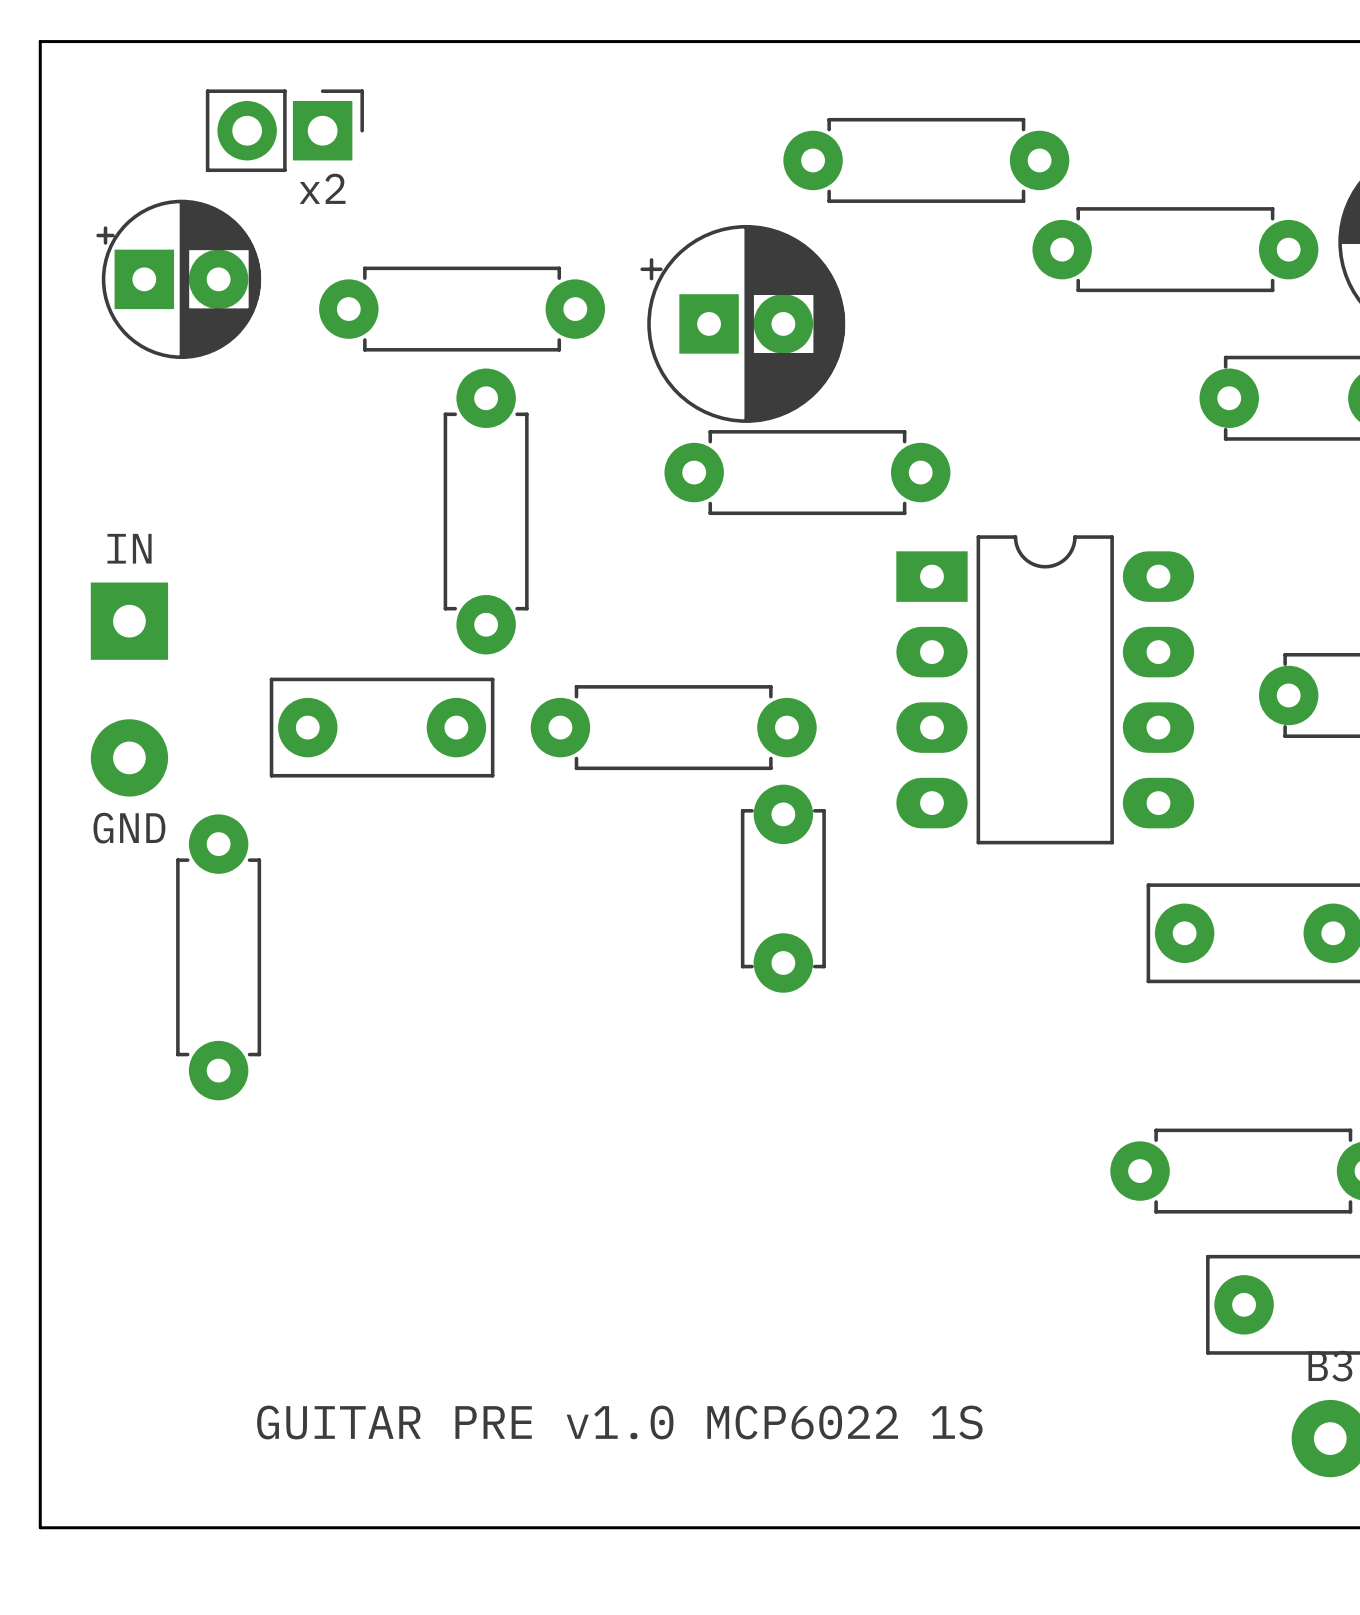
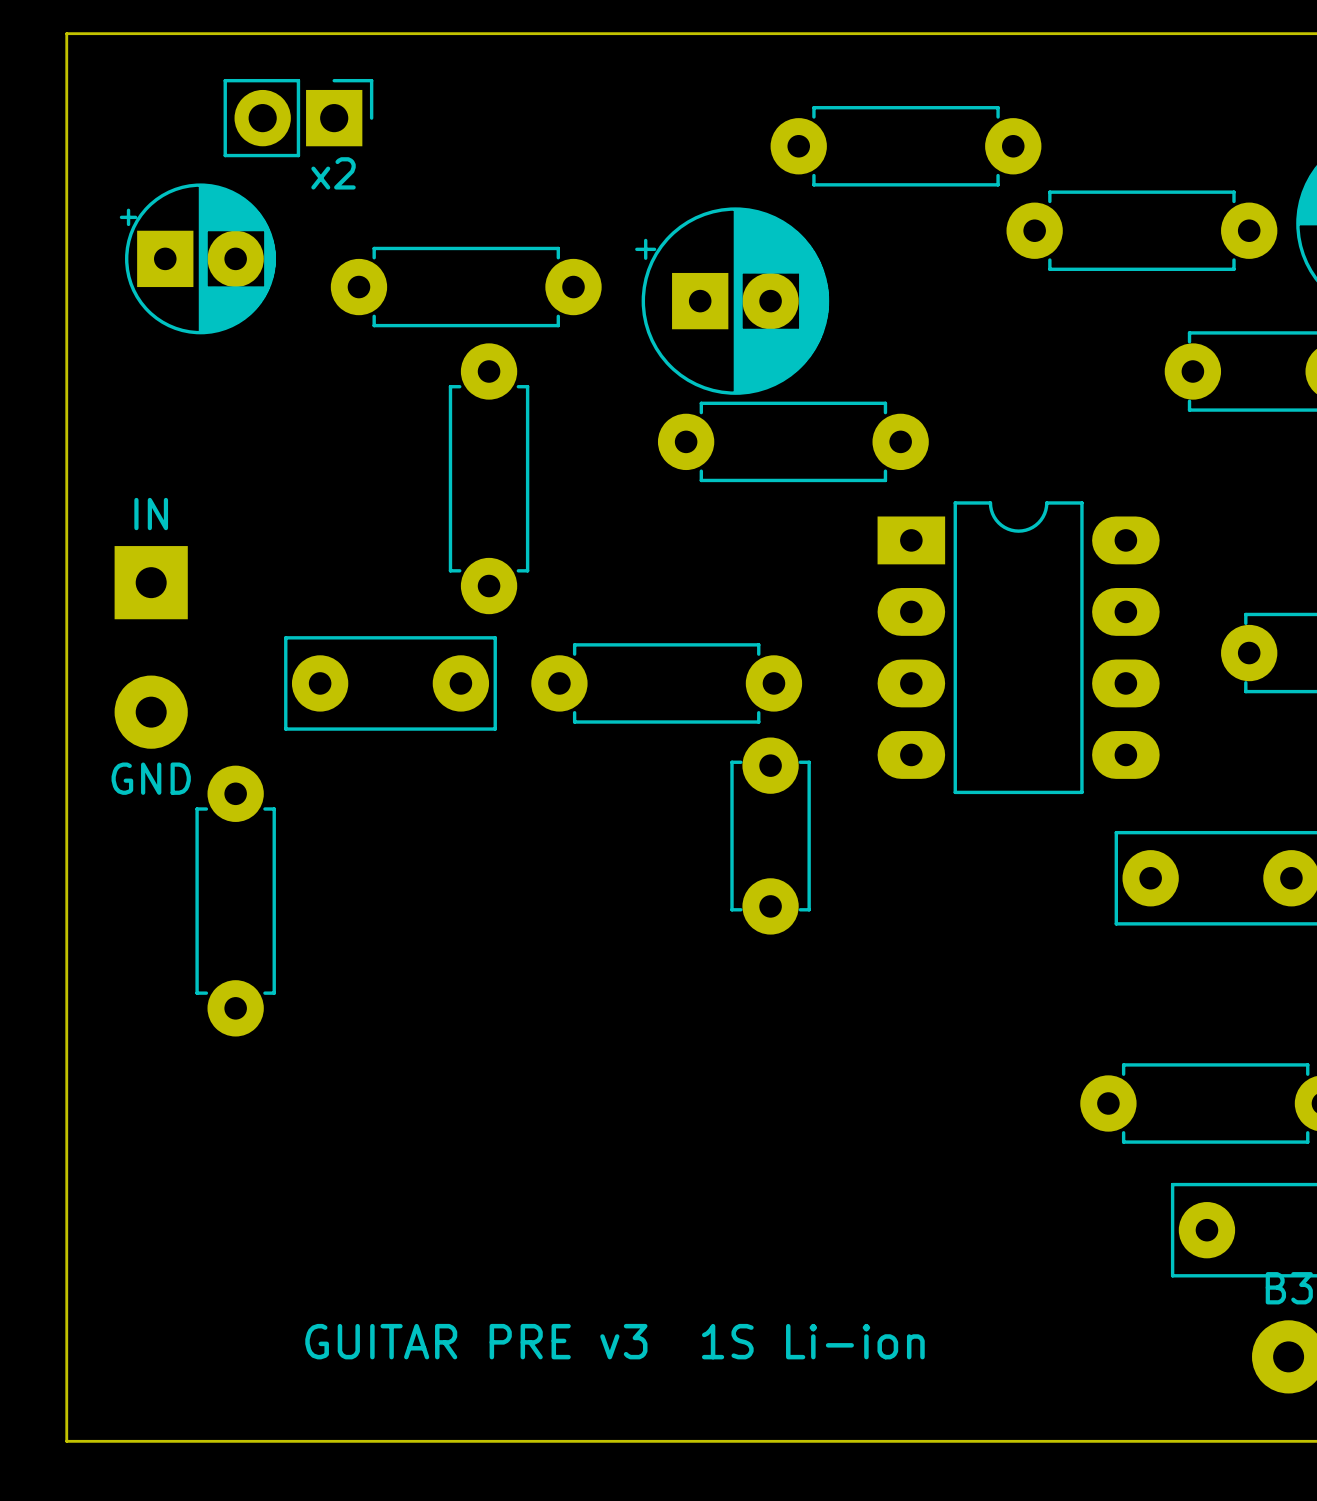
text: GUITAR PRE v1.0 MCP6022 1S (619, 1422) -> GUITAR PRE v3 1S Li-ion (614, 1341)

